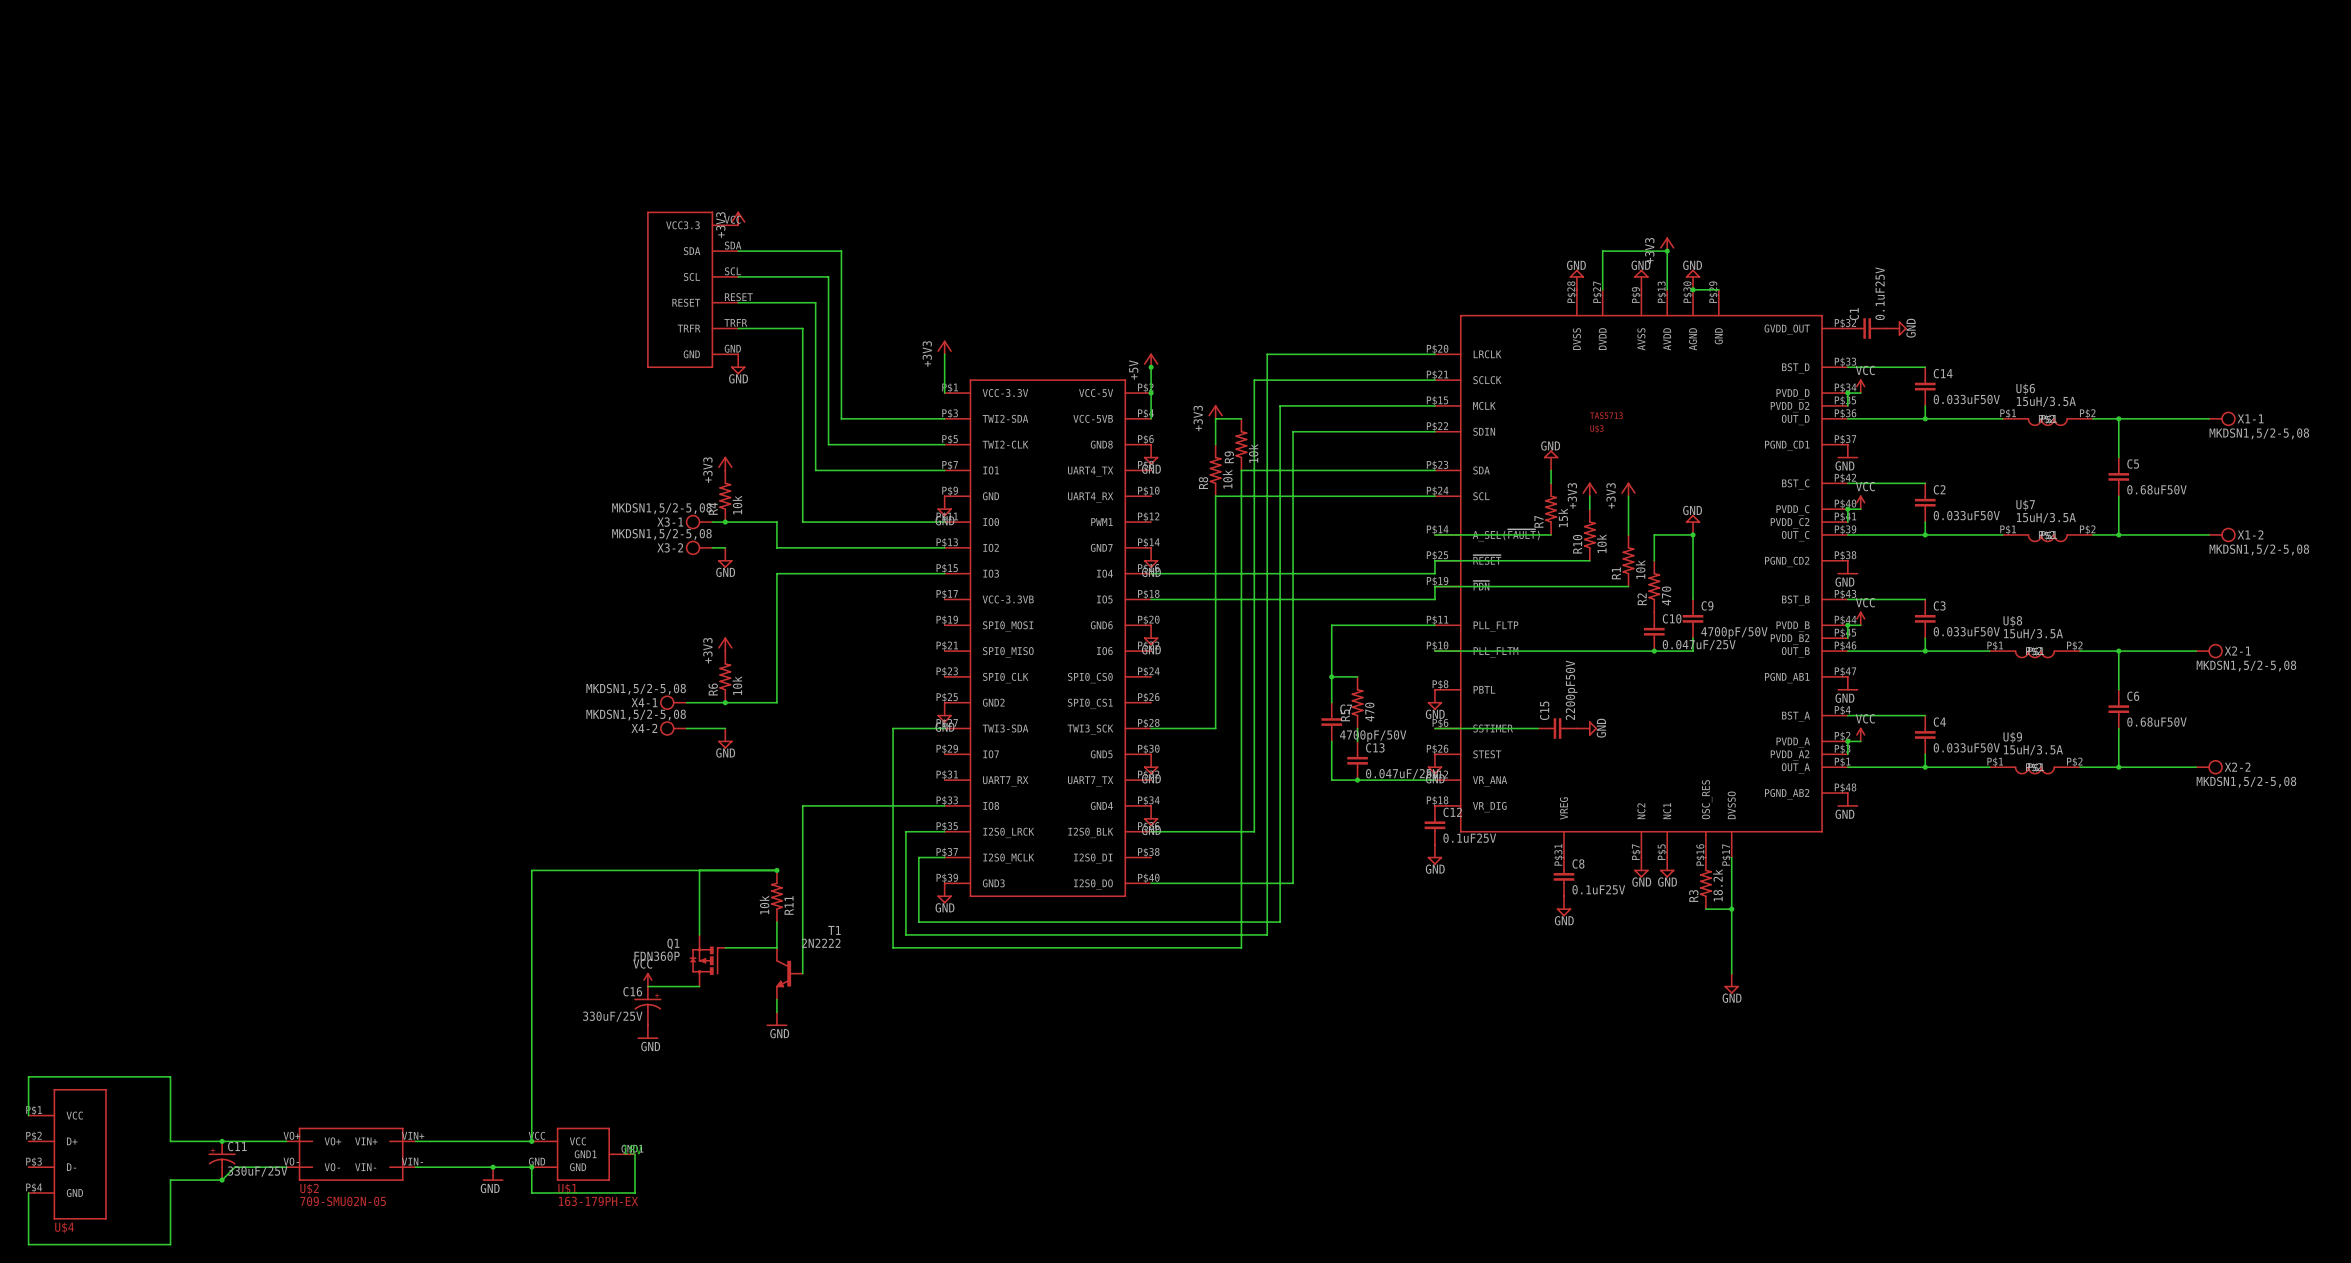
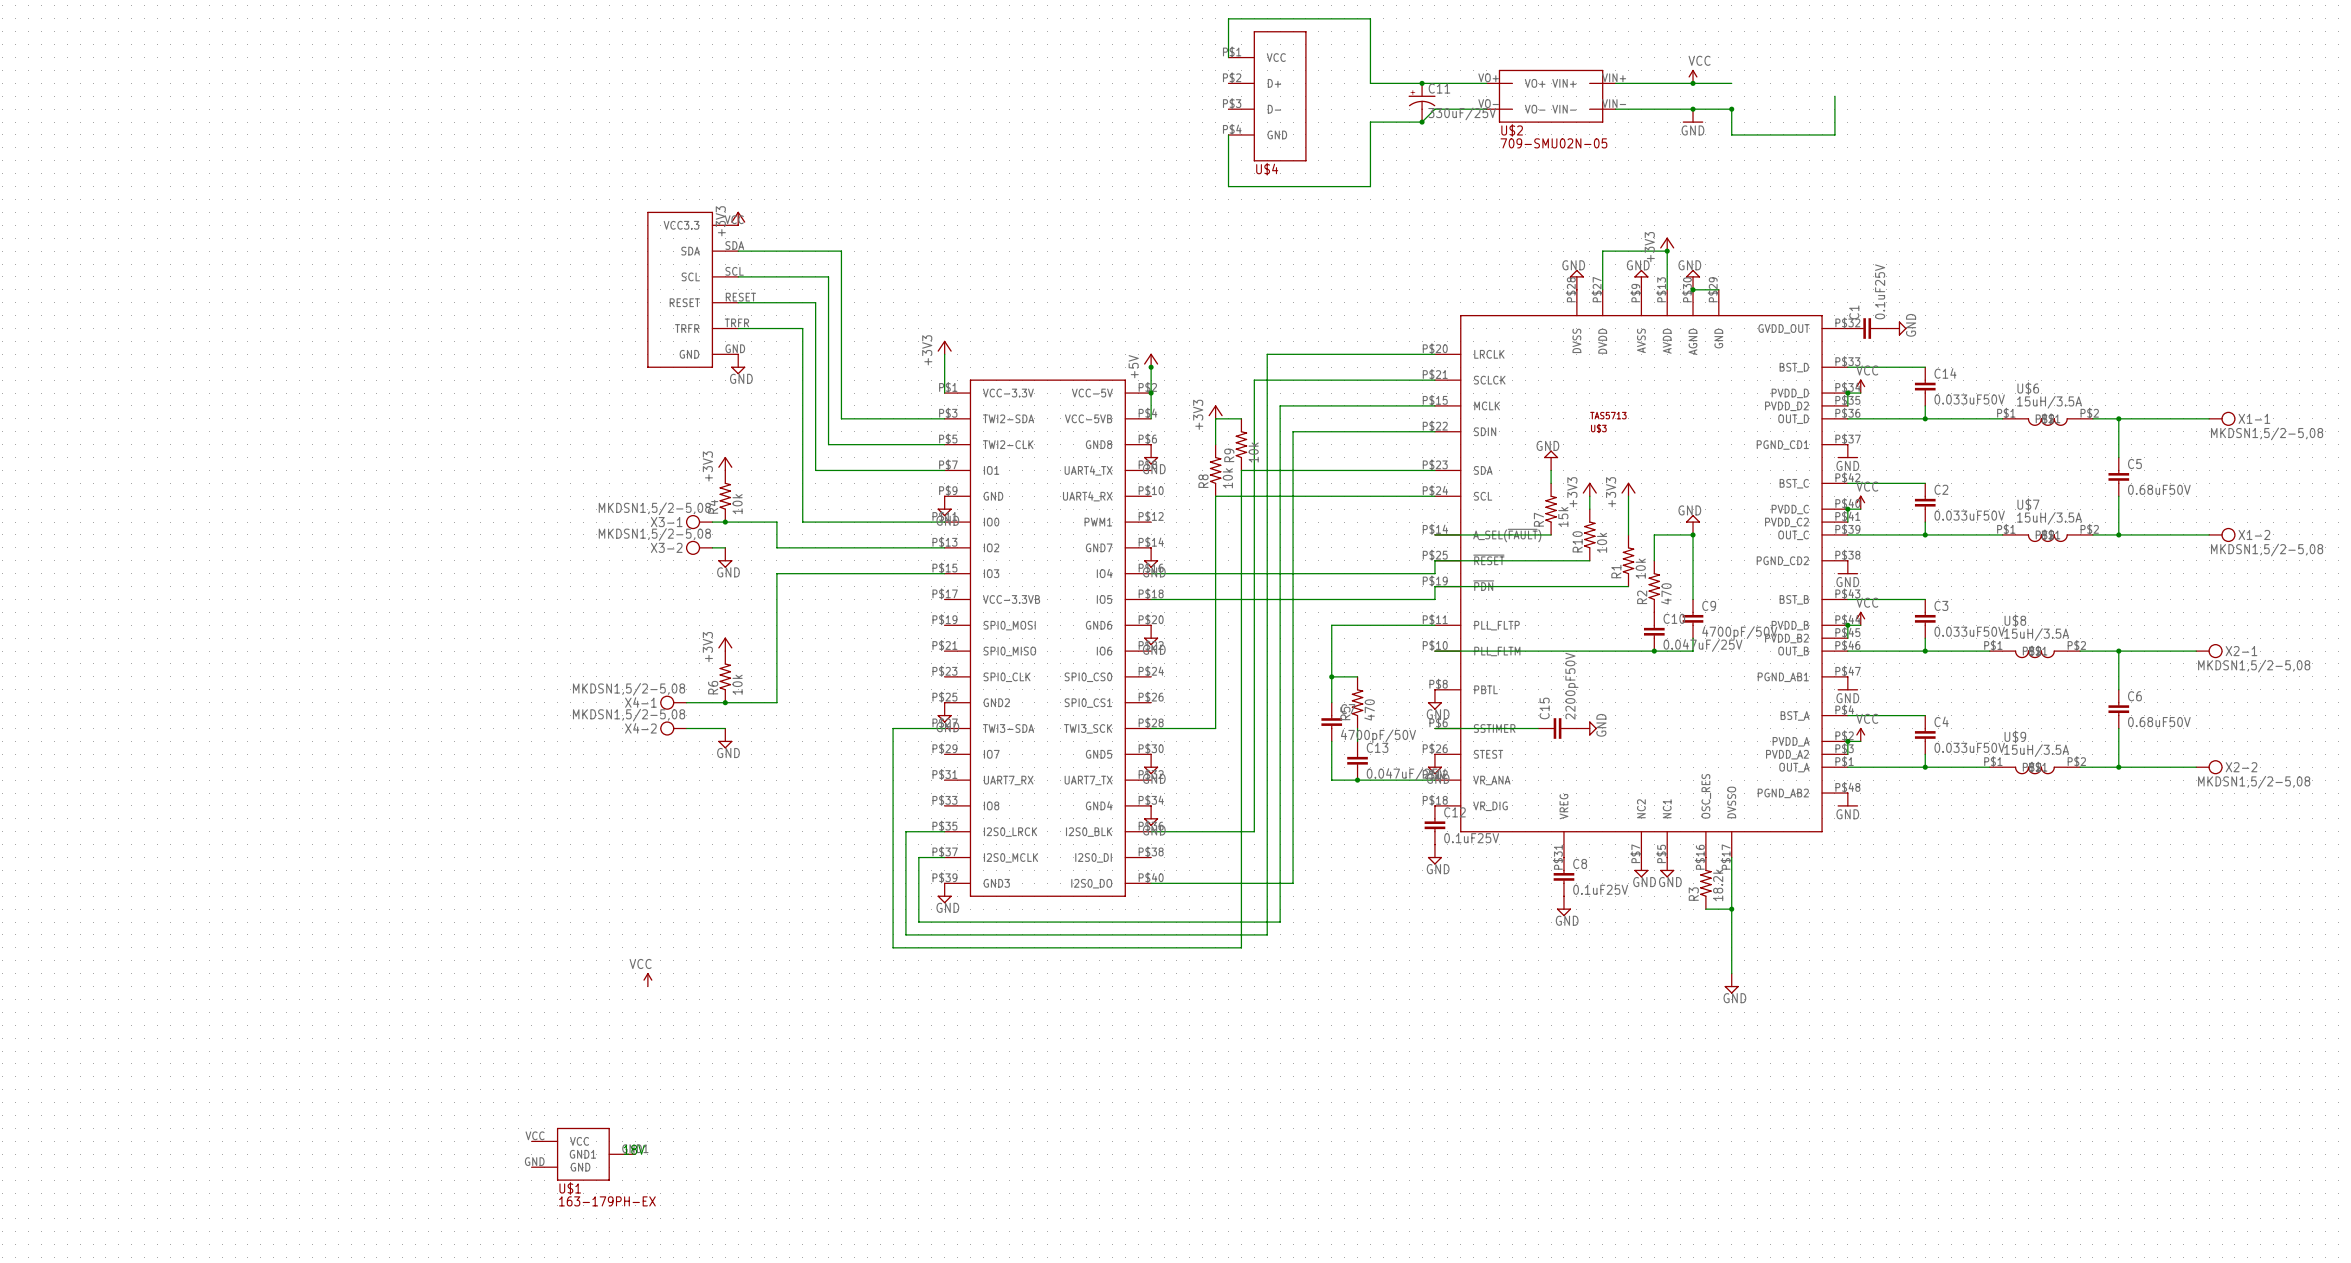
wire: none -> (1228, 57) (1228, 18) (1370, 18) (1370, 83) (1486, 83)
power symbol: none -> VCC (1693, 76)
junction: none -> (1422, 83)
wire: none -> (1615, 83) (1731, 83)
junction: none -> (1693, 83)
wire: none -> (1834, 96) (1834, 134) (1731, 134) (1731, 109) (1615, 109)
wire: none -> (1486, 109) (1434, 109) (1422, 122) (1370, 122) (1370, 186) (1228, 186) (1228, 134)
junction: none -> (1693, 109)
junction: none -> (1731, 109)
power symbol: none -> GND (1693, 115)
junction: none -> (1422, 122)
wire: (944, 805) (802, 805) (802, 973) -> none
wire: (699, 870) (699, 934) -> none
wire: (776, 870) (531, 870) (531, 1141) (415, 1141) -> none
junction: (776, 870) -> none
R11: 10k (776, 896) -> none
wire: (776, 922) (776, 947) (725, 947) -> none
Q1: FDN360P (707, 960) -> none
T1: 2N2222 (789, 973) -> none
wire: (647, 986) (699, 986) -> none
wire: (776, 999) (776, 1012) -> none
C16: 330uF/25V (647, 1005) -> none
power symbol: GND (776, 1019) -> none
power symbol: GND (647, 1032) -> none
wire: (28, 1115) (28, 1076) (170, 1076) (170, 1141) (286, 1141) -> none
junction: (222, 1141) -> none
junction: (531, 1141) -> none
U$4 position: (67, 1154) -> (1267, 96)
U$2 position: (351, 1154) -> (1551, 96)
wire: (635, 1154) (635, 1193) (531, 1193) (531, 1167) (415, 1167) -> none
C11 position: (222, 1160) -> (1422, 102)
wire: (286, 1167) (235, 1167) (222, 1180) (170, 1180) (170, 1244) (28, 1244) (28, 1193) -> none
junction: (493, 1167) -> none
junction: (531, 1167) -> none
power symbol: GND (493, 1173) -> none
junction: (222, 1180) -> none

